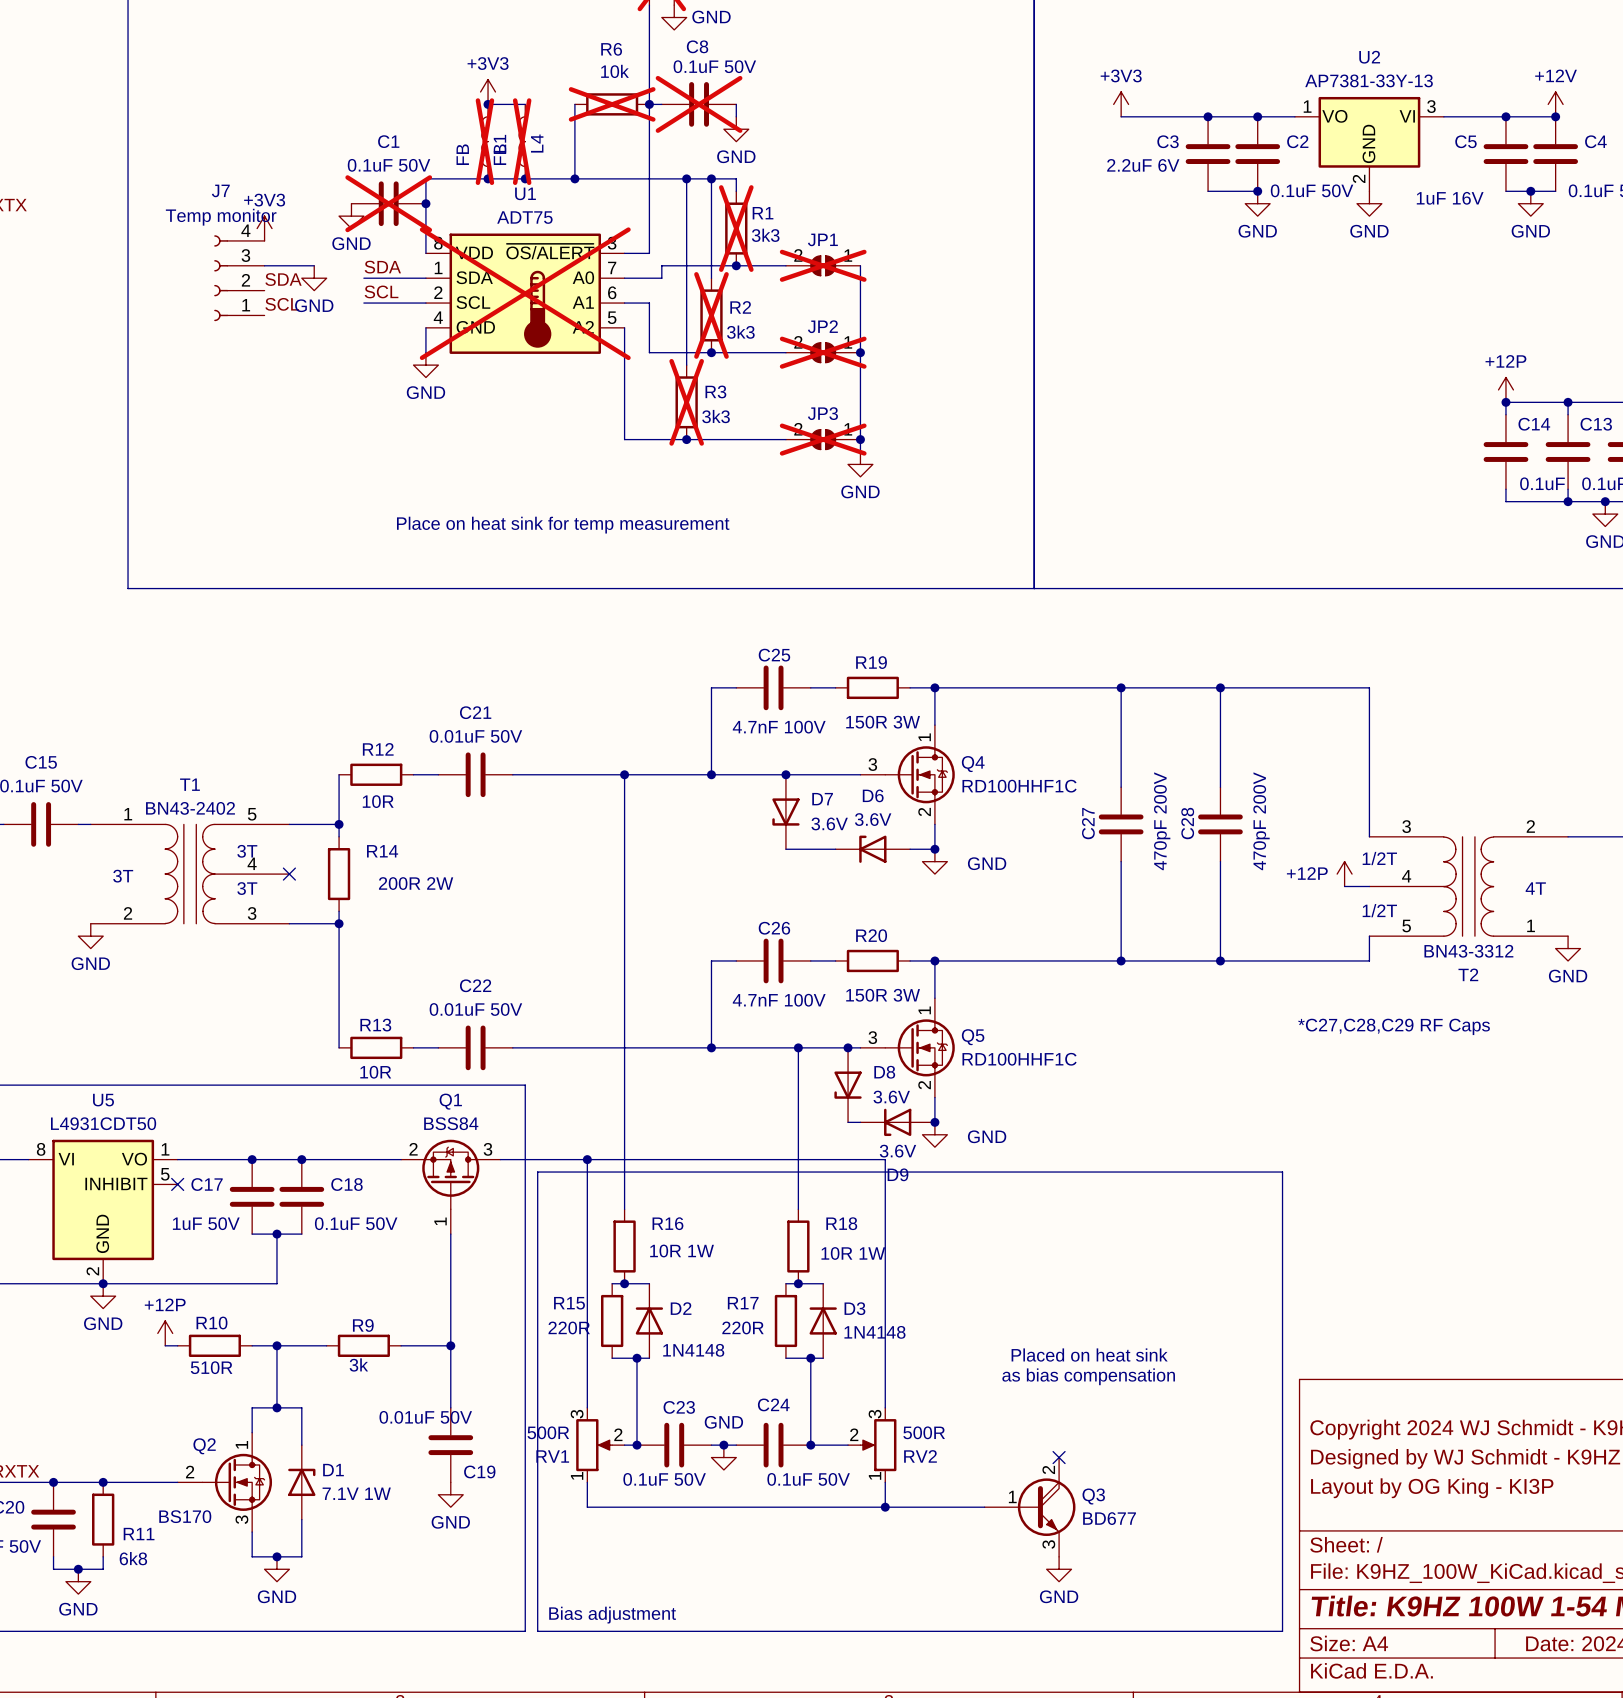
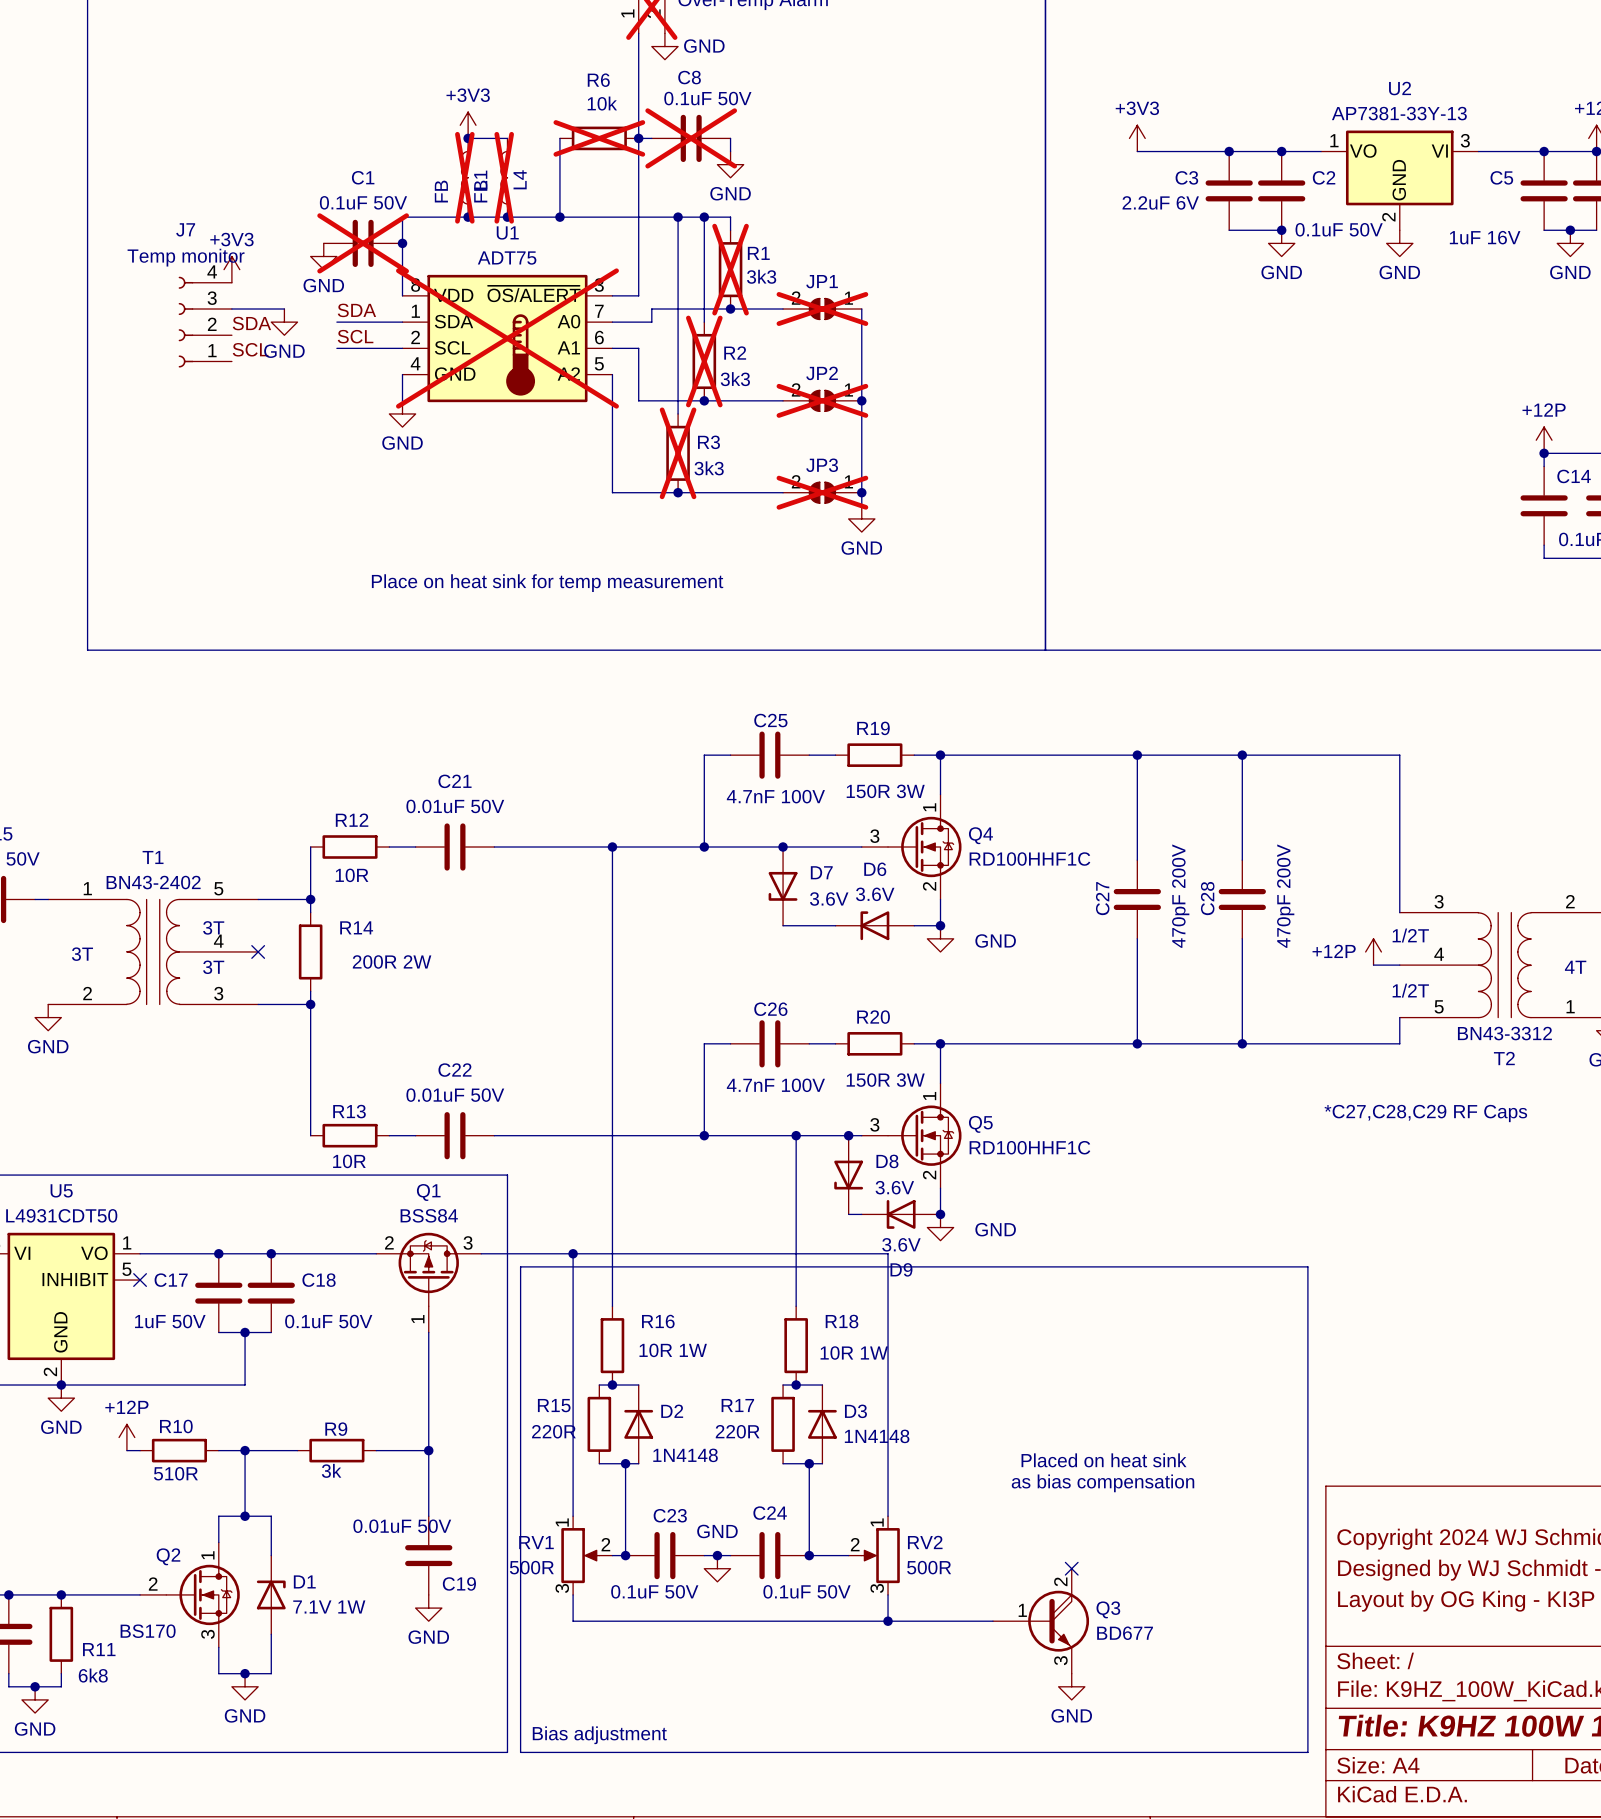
RV1 flip: as is (594, 1445) -> up-down (580, 1555)
RV2 flip: as is (878, 1445) -> up-down (880, 1555)

